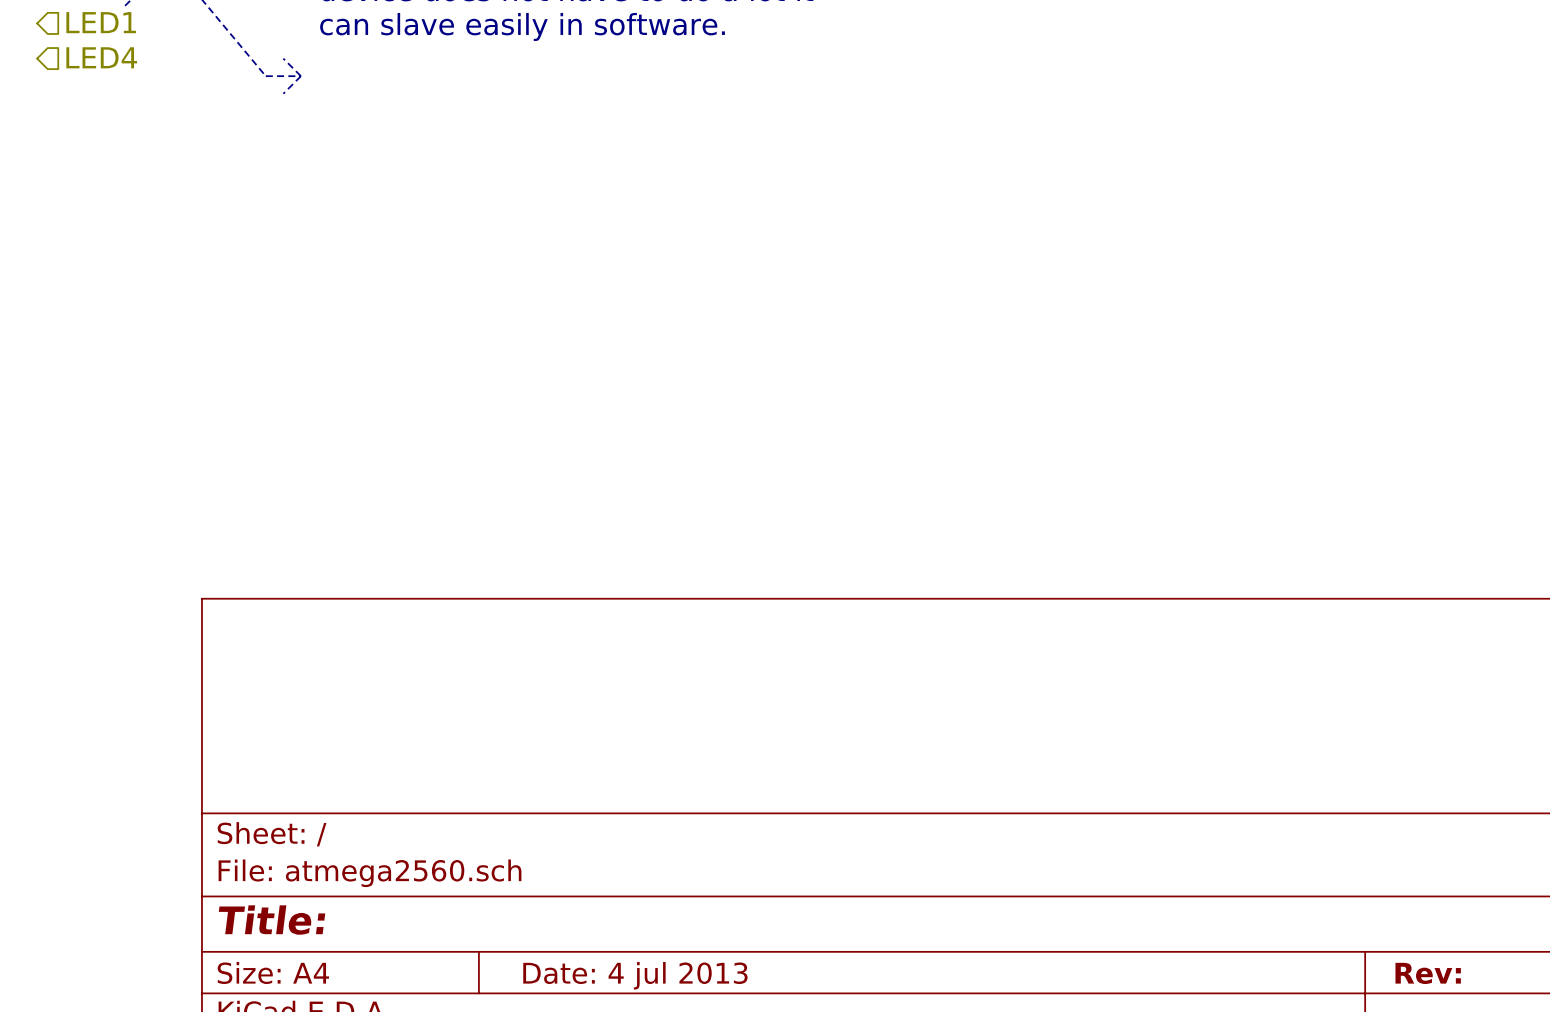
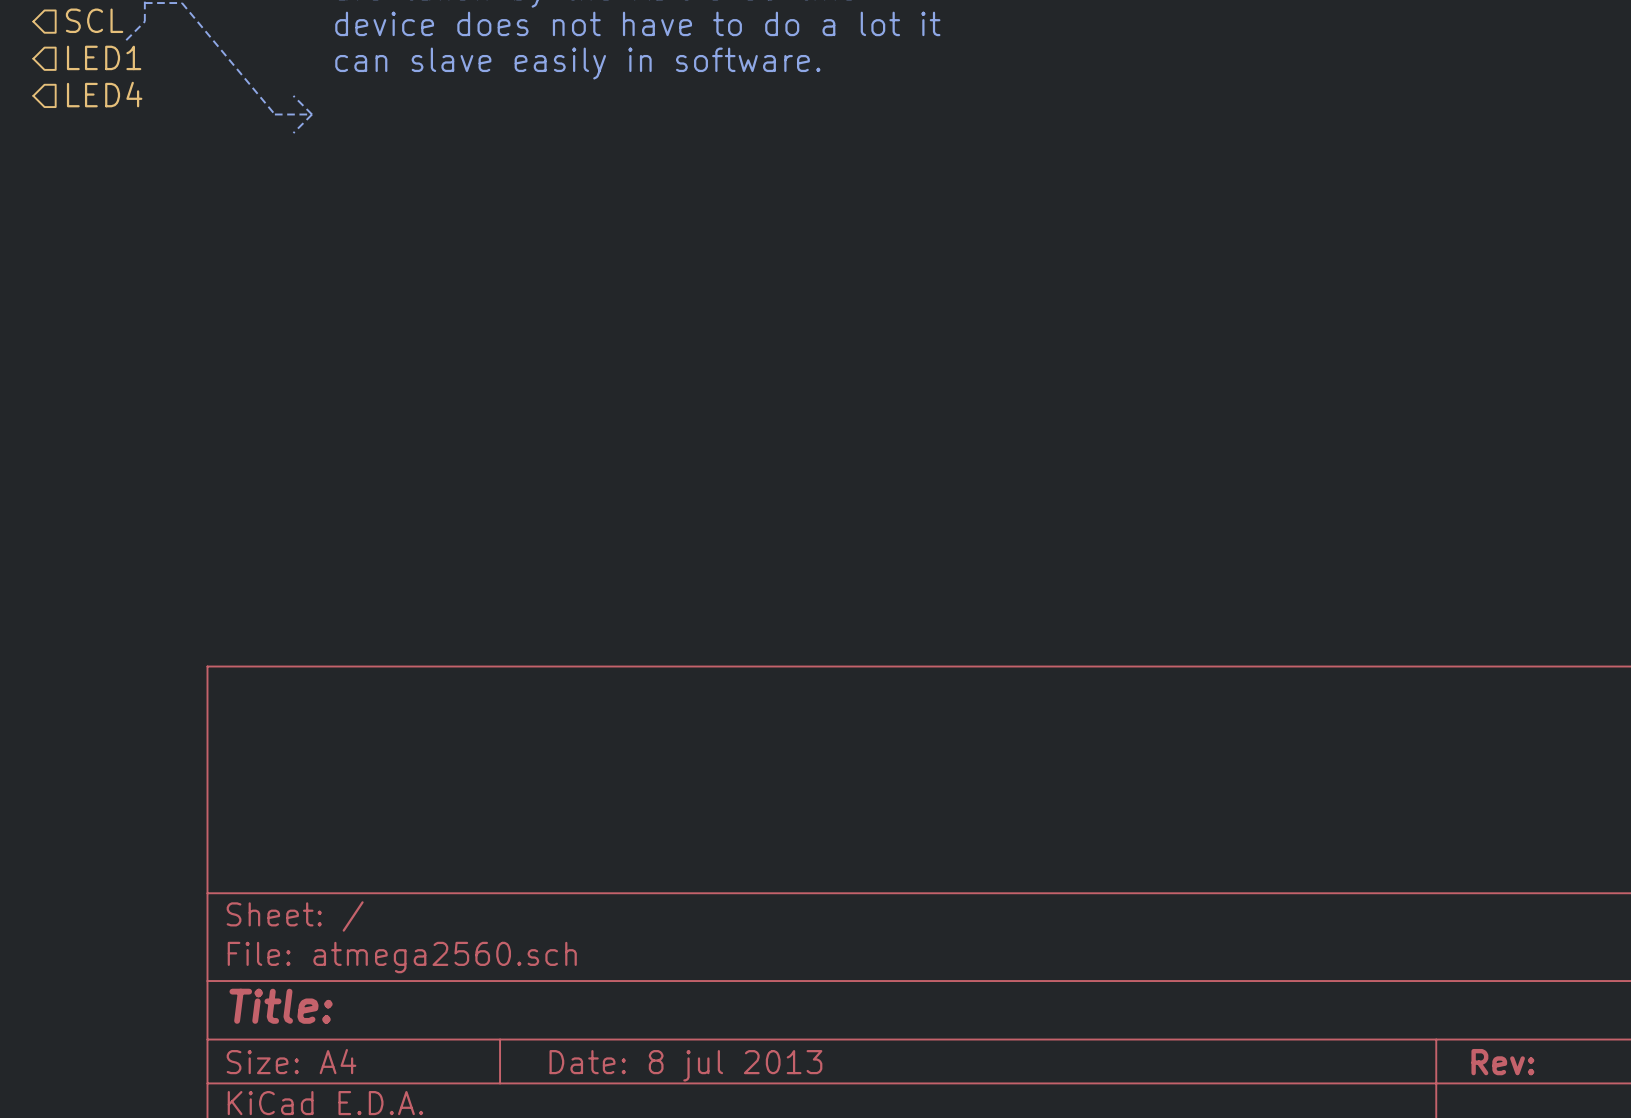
title block: Date: 4 jul 2013 (635, 975) -> Date: 8 jul 2013 (685, 1065)

